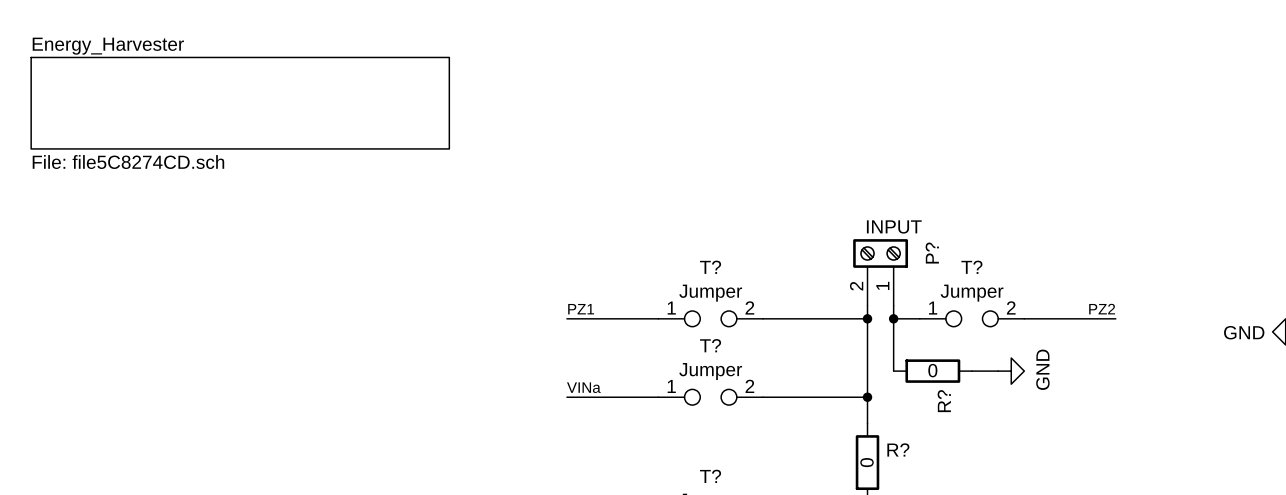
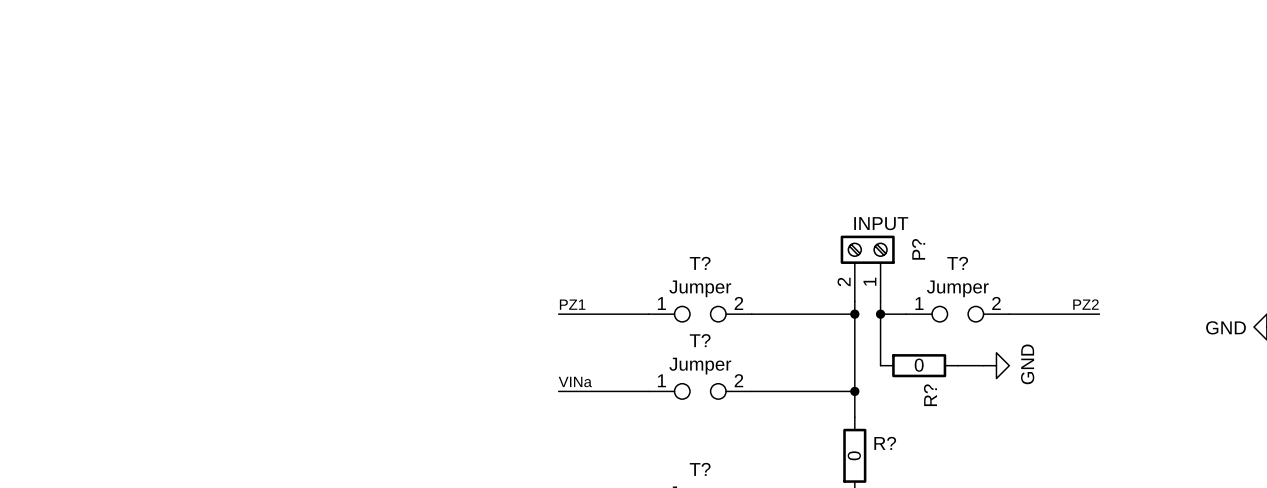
sheet Energy_Harvester: File: file5C8274CD.sch (240, 103) -> none

